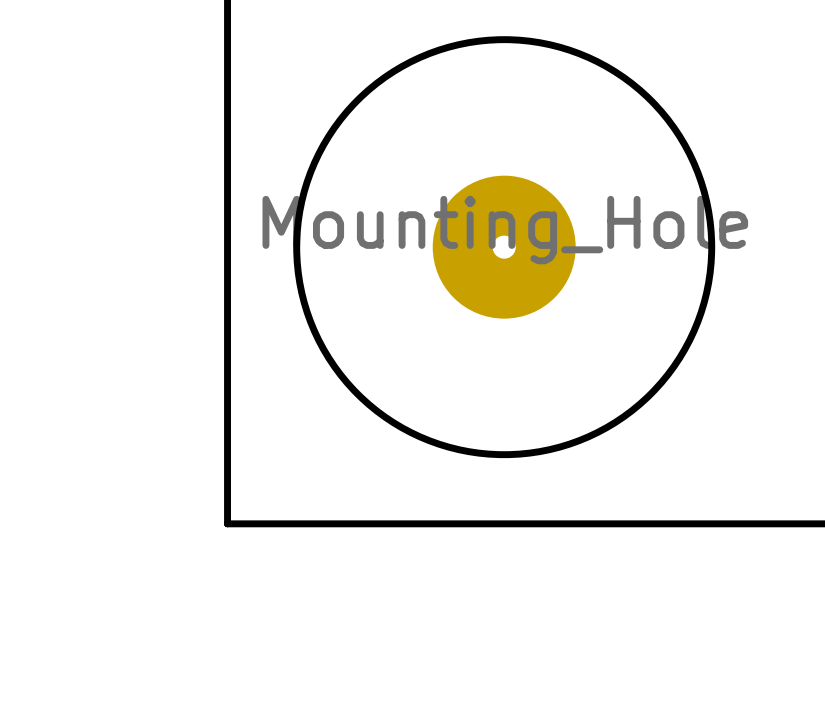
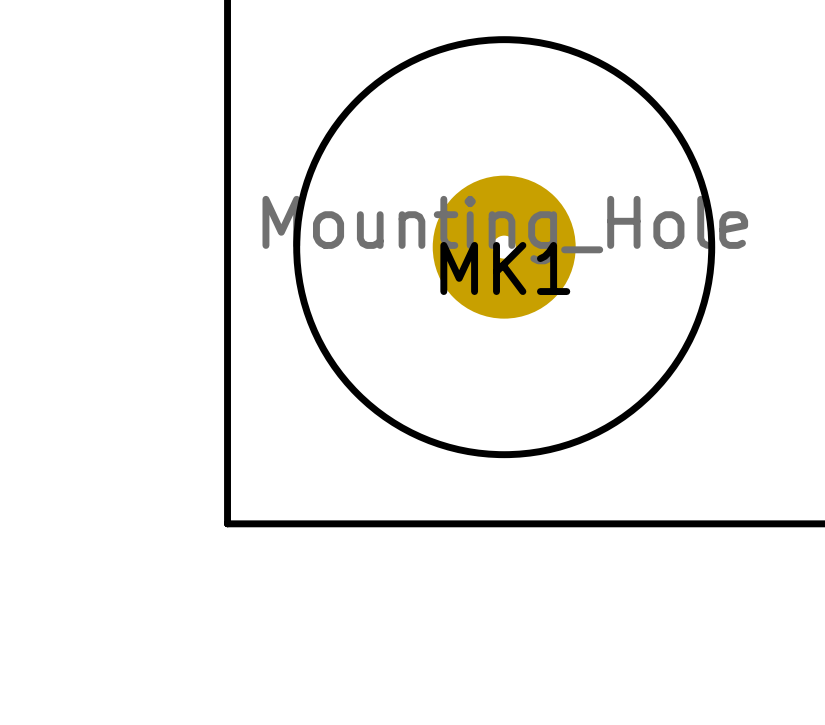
MK1 name: none -> MK1 (505, 268)

